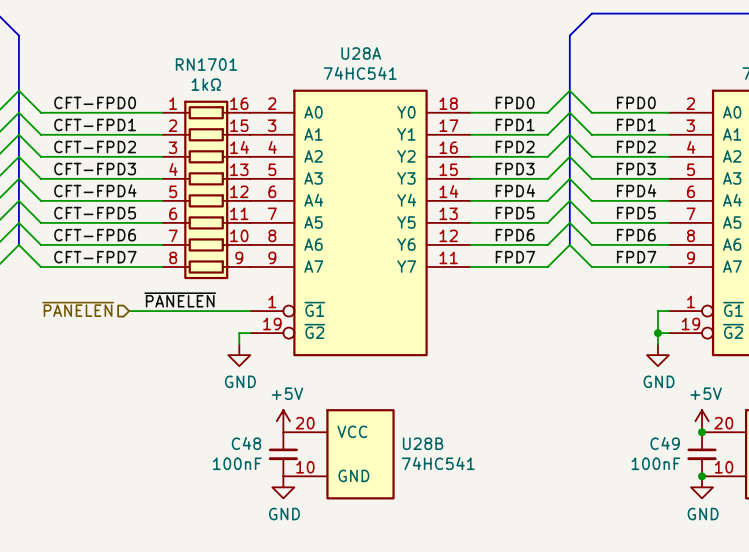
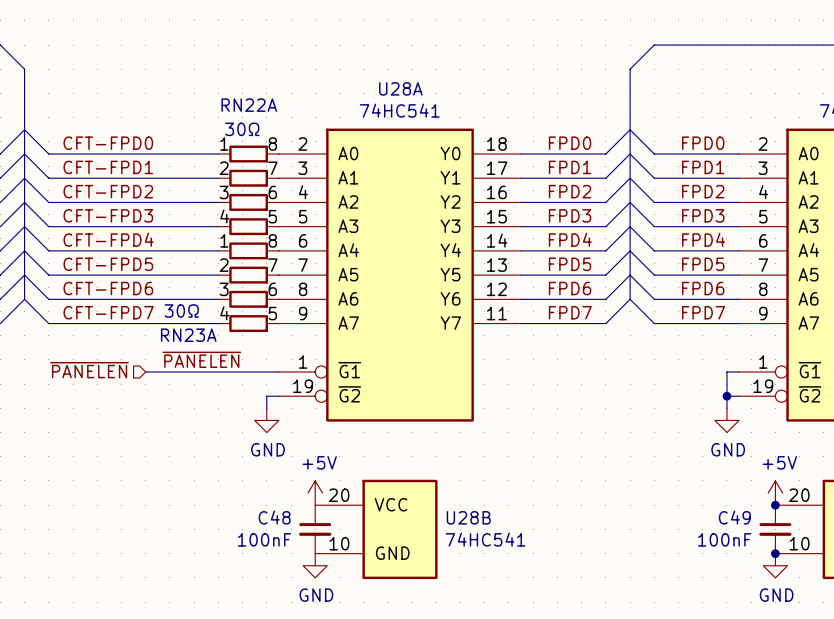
RN22A: none -> 30Ω (248, 154)
part: none -> (248, 178)
part: none -> (248, 202)
part: none -> (248, 226)
RN1701: 1kΩ (206, 189) -> none
RN23A: none -> (248, 250)
part: none -> (248, 275)
part: none -> (248, 299)
part: none -> 30Ω (248, 323)

